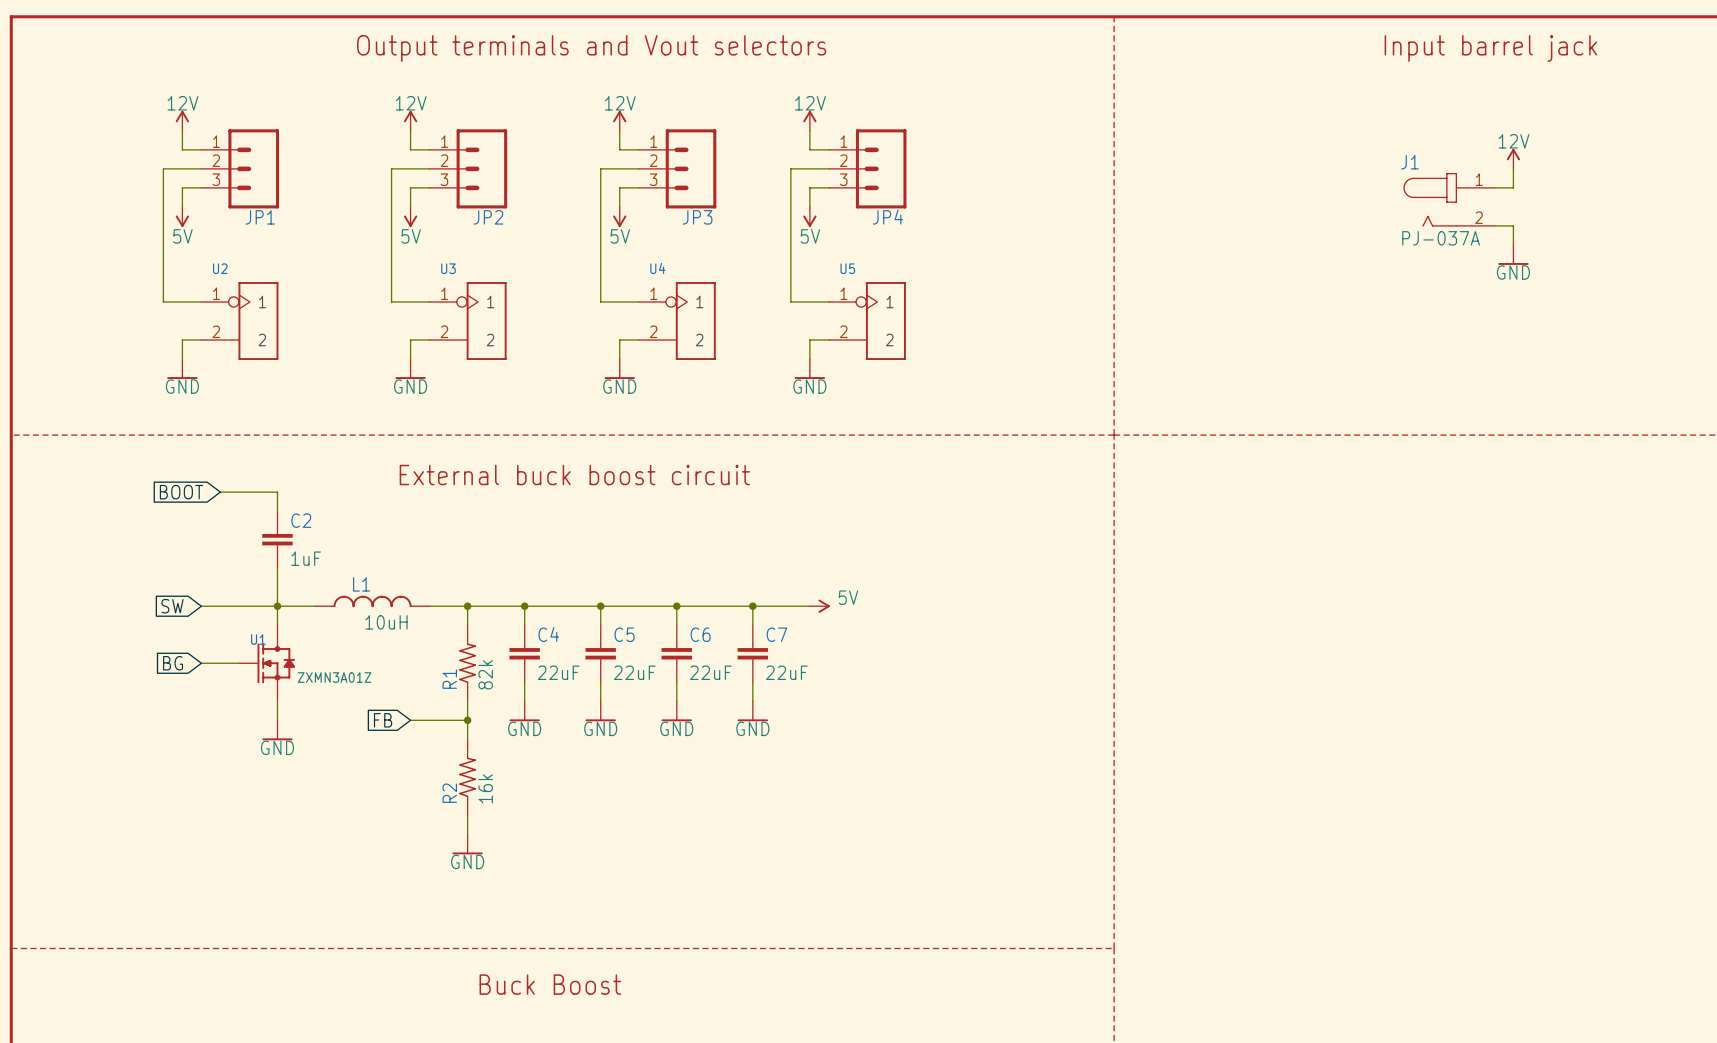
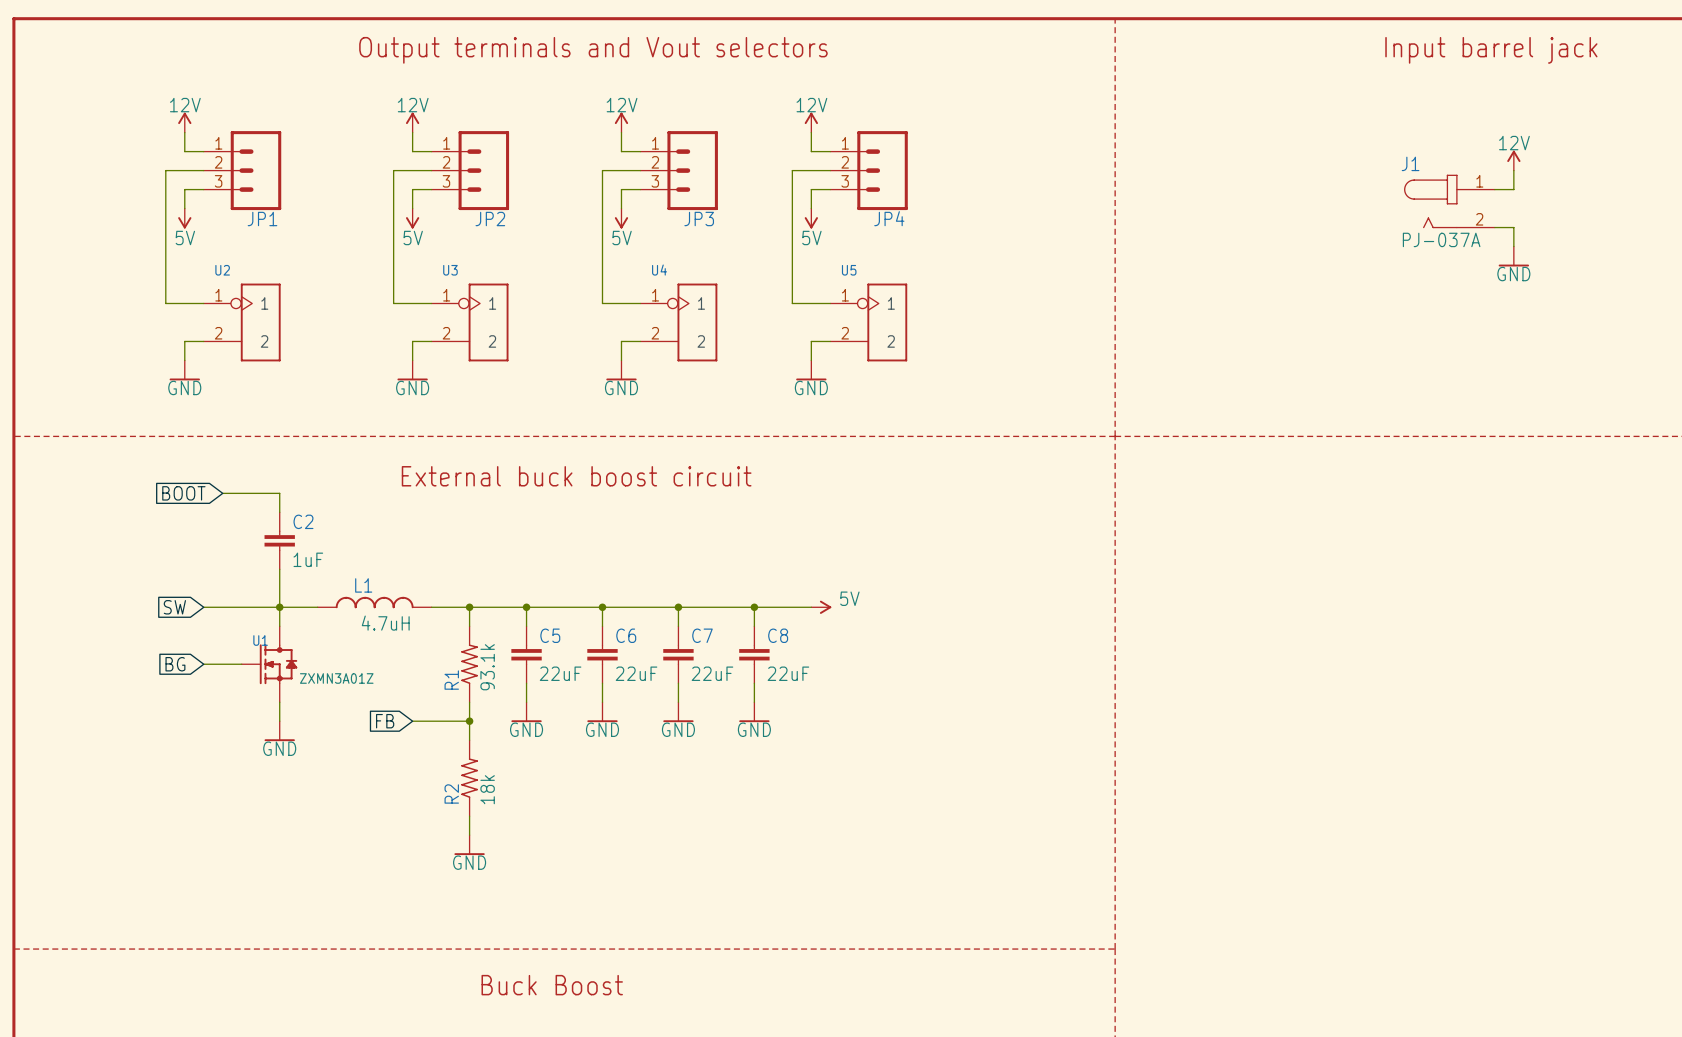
L1 value: 10uH (386, 622) -> 4.7uH (385, 623)
C4 name: C4 (548, 634) -> C5 (550, 635)
C5 name: C5 (624, 634) -> C6 (626, 635)
C6 name: C6 (700, 634) -> C7 (702, 635)
C7 name: C7 (776, 634) -> C8 (778, 635)
R1 value: 82k (485, 674) -> 93.1k (487, 667)
R2 value: 16k (485, 788) -> 18k (487, 789)

